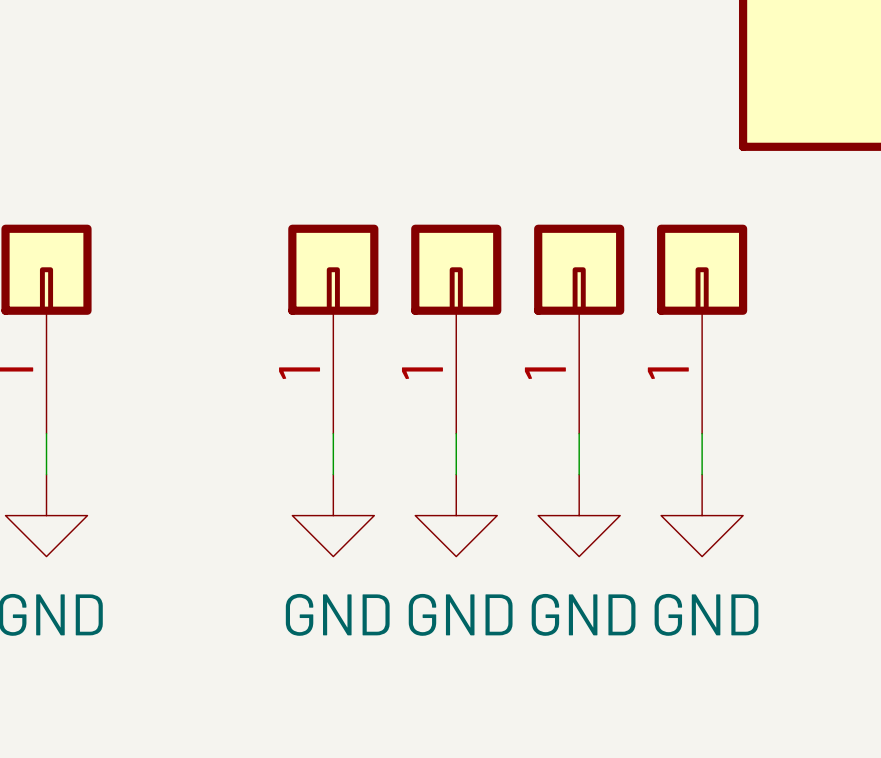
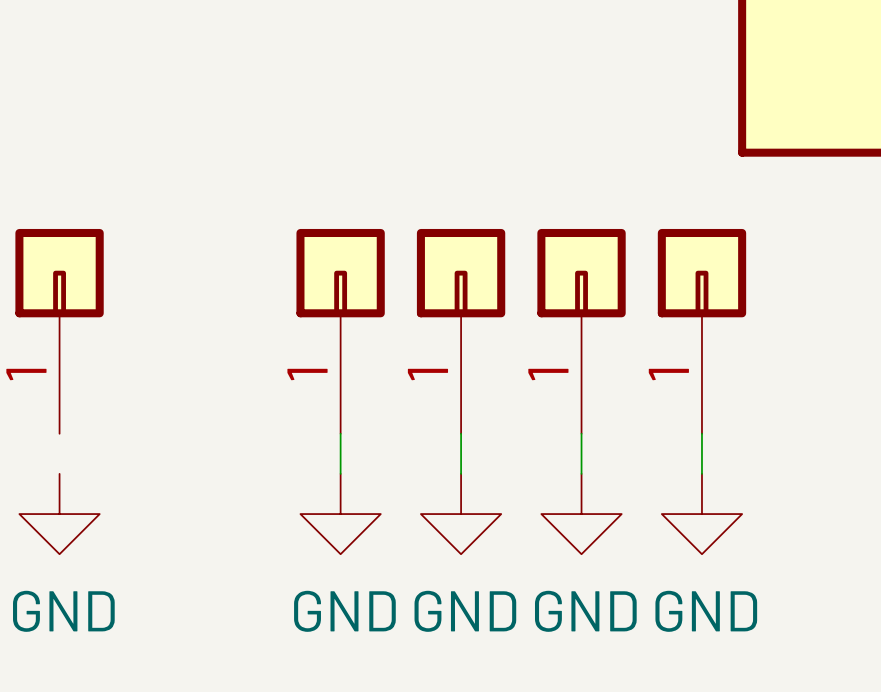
wire: (46, 433) (46, 474) -> none

